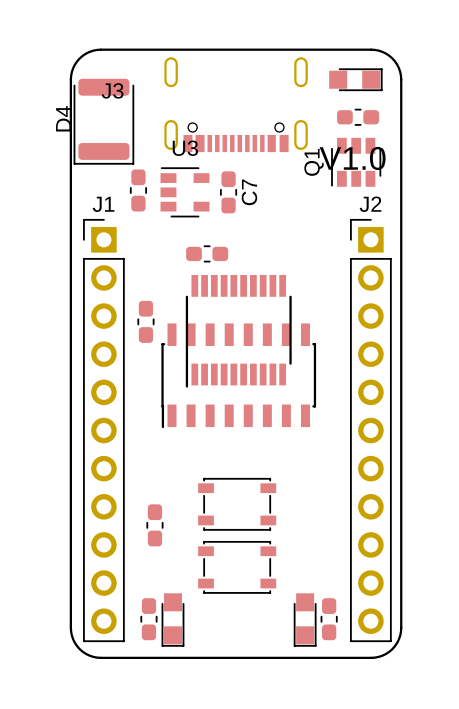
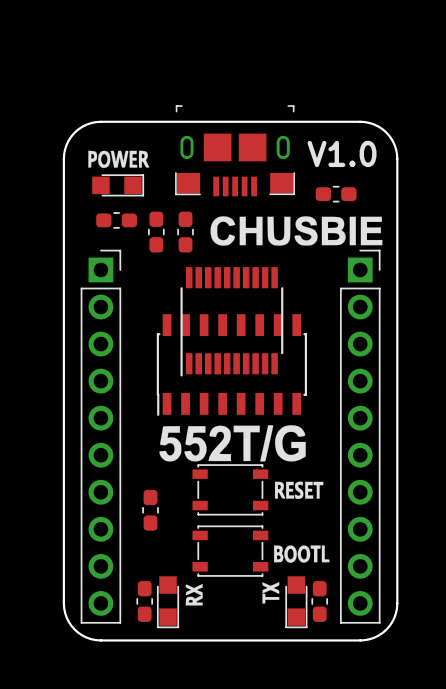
board edge: (100, 49) (371, 49) (378, 50) (389, 55) (398, 68) (401, 79) (401, 627) (397, 642) (389, 651) (382, 655) (371, 657) (100, 657) (85, 653) (77, 646) (73, 639) (70, 627) (70, 79) (73, 68) (79, 58) (89, 51) (100, 49) -> (100, 121) (86, 124) (74, 132) (66, 144) (63, 158) (63, 603) (68, 621) (82, 635) (100, 640) (360, 640) (378, 635) (392, 621) (397, 603) (397, 158) (392, 140) (378, 126) (360, 121) (100, 121)
part position: (355, 79) -> (118, 185)
J3: (236, 104) -> none
part: (358, 117) -> none
D4: (103, 121) -> none
drawing: none -> [88, 150, 383, 606]
part: none -> (235, 150)
Q1: (356, 162) -> none
part: (138, 190) -> none
U3: (184, 192) -> none
C7: (228, 192) -> none
part: none -> (336, 194)
part: none -> (116, 220)
part: none -> (156, 232)
part rotation: 0° (207, 253) -> 90° clockwise (185, 232)
part: (145, 321) -> none
J1: (103, 430) -> none
J2: (370, 430) -> none
part: none -> (100, 436)
part: none -> (360, 436)

